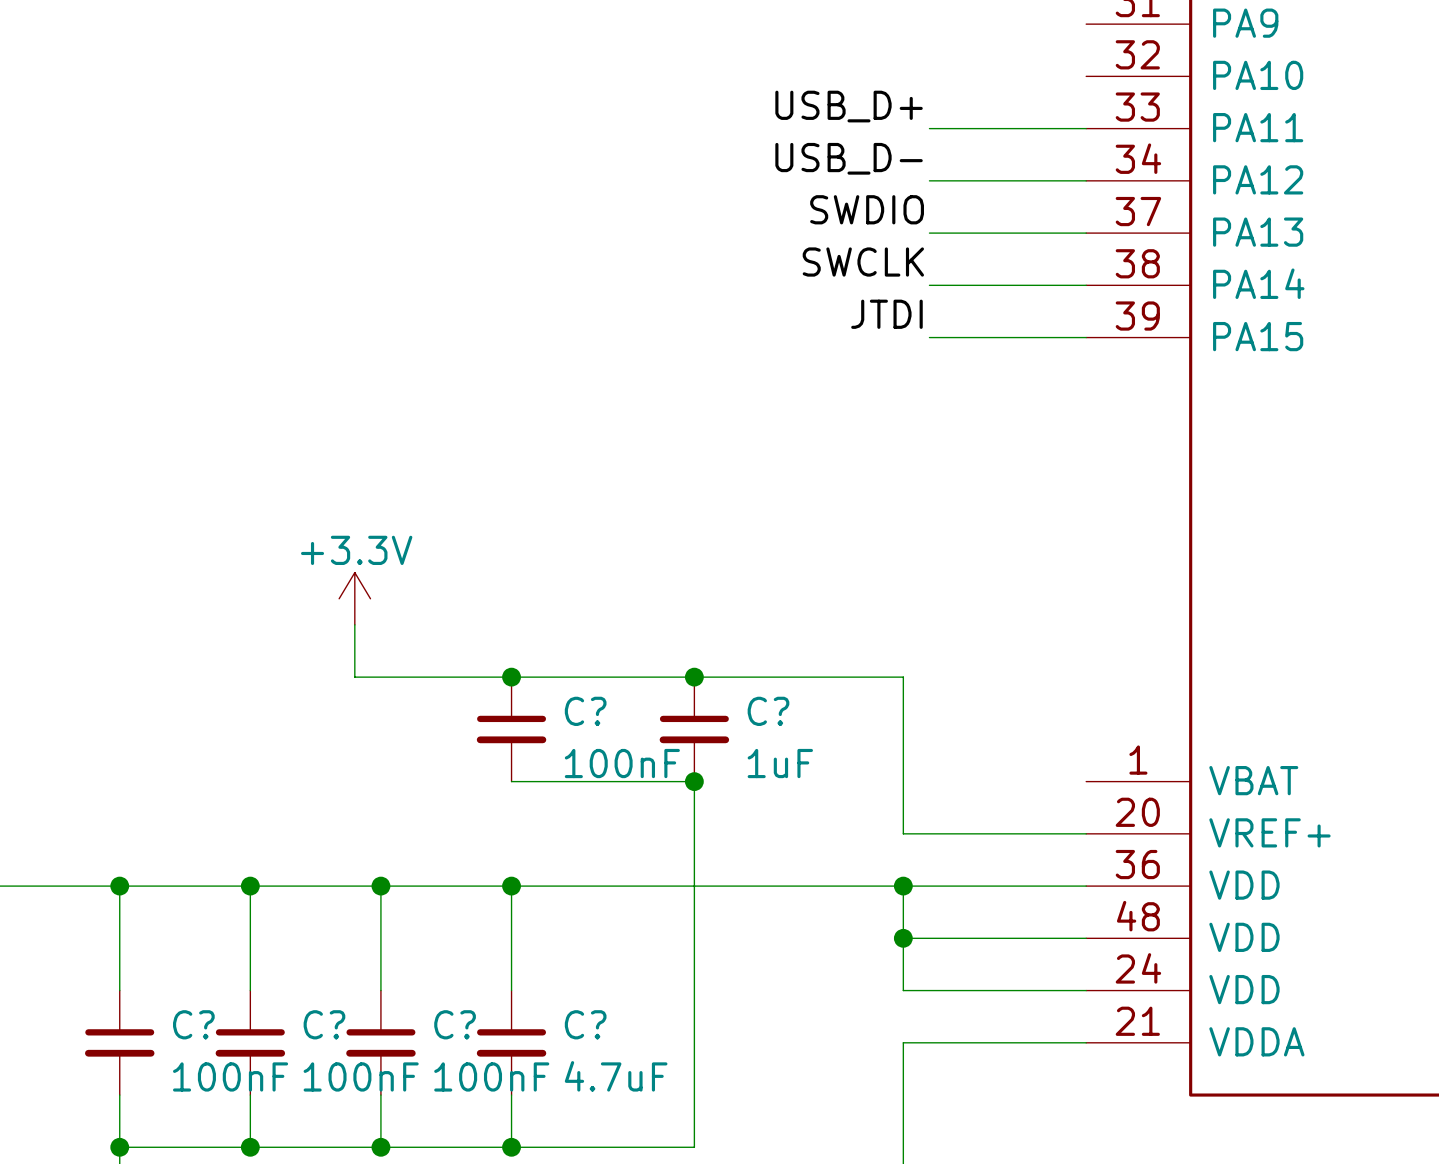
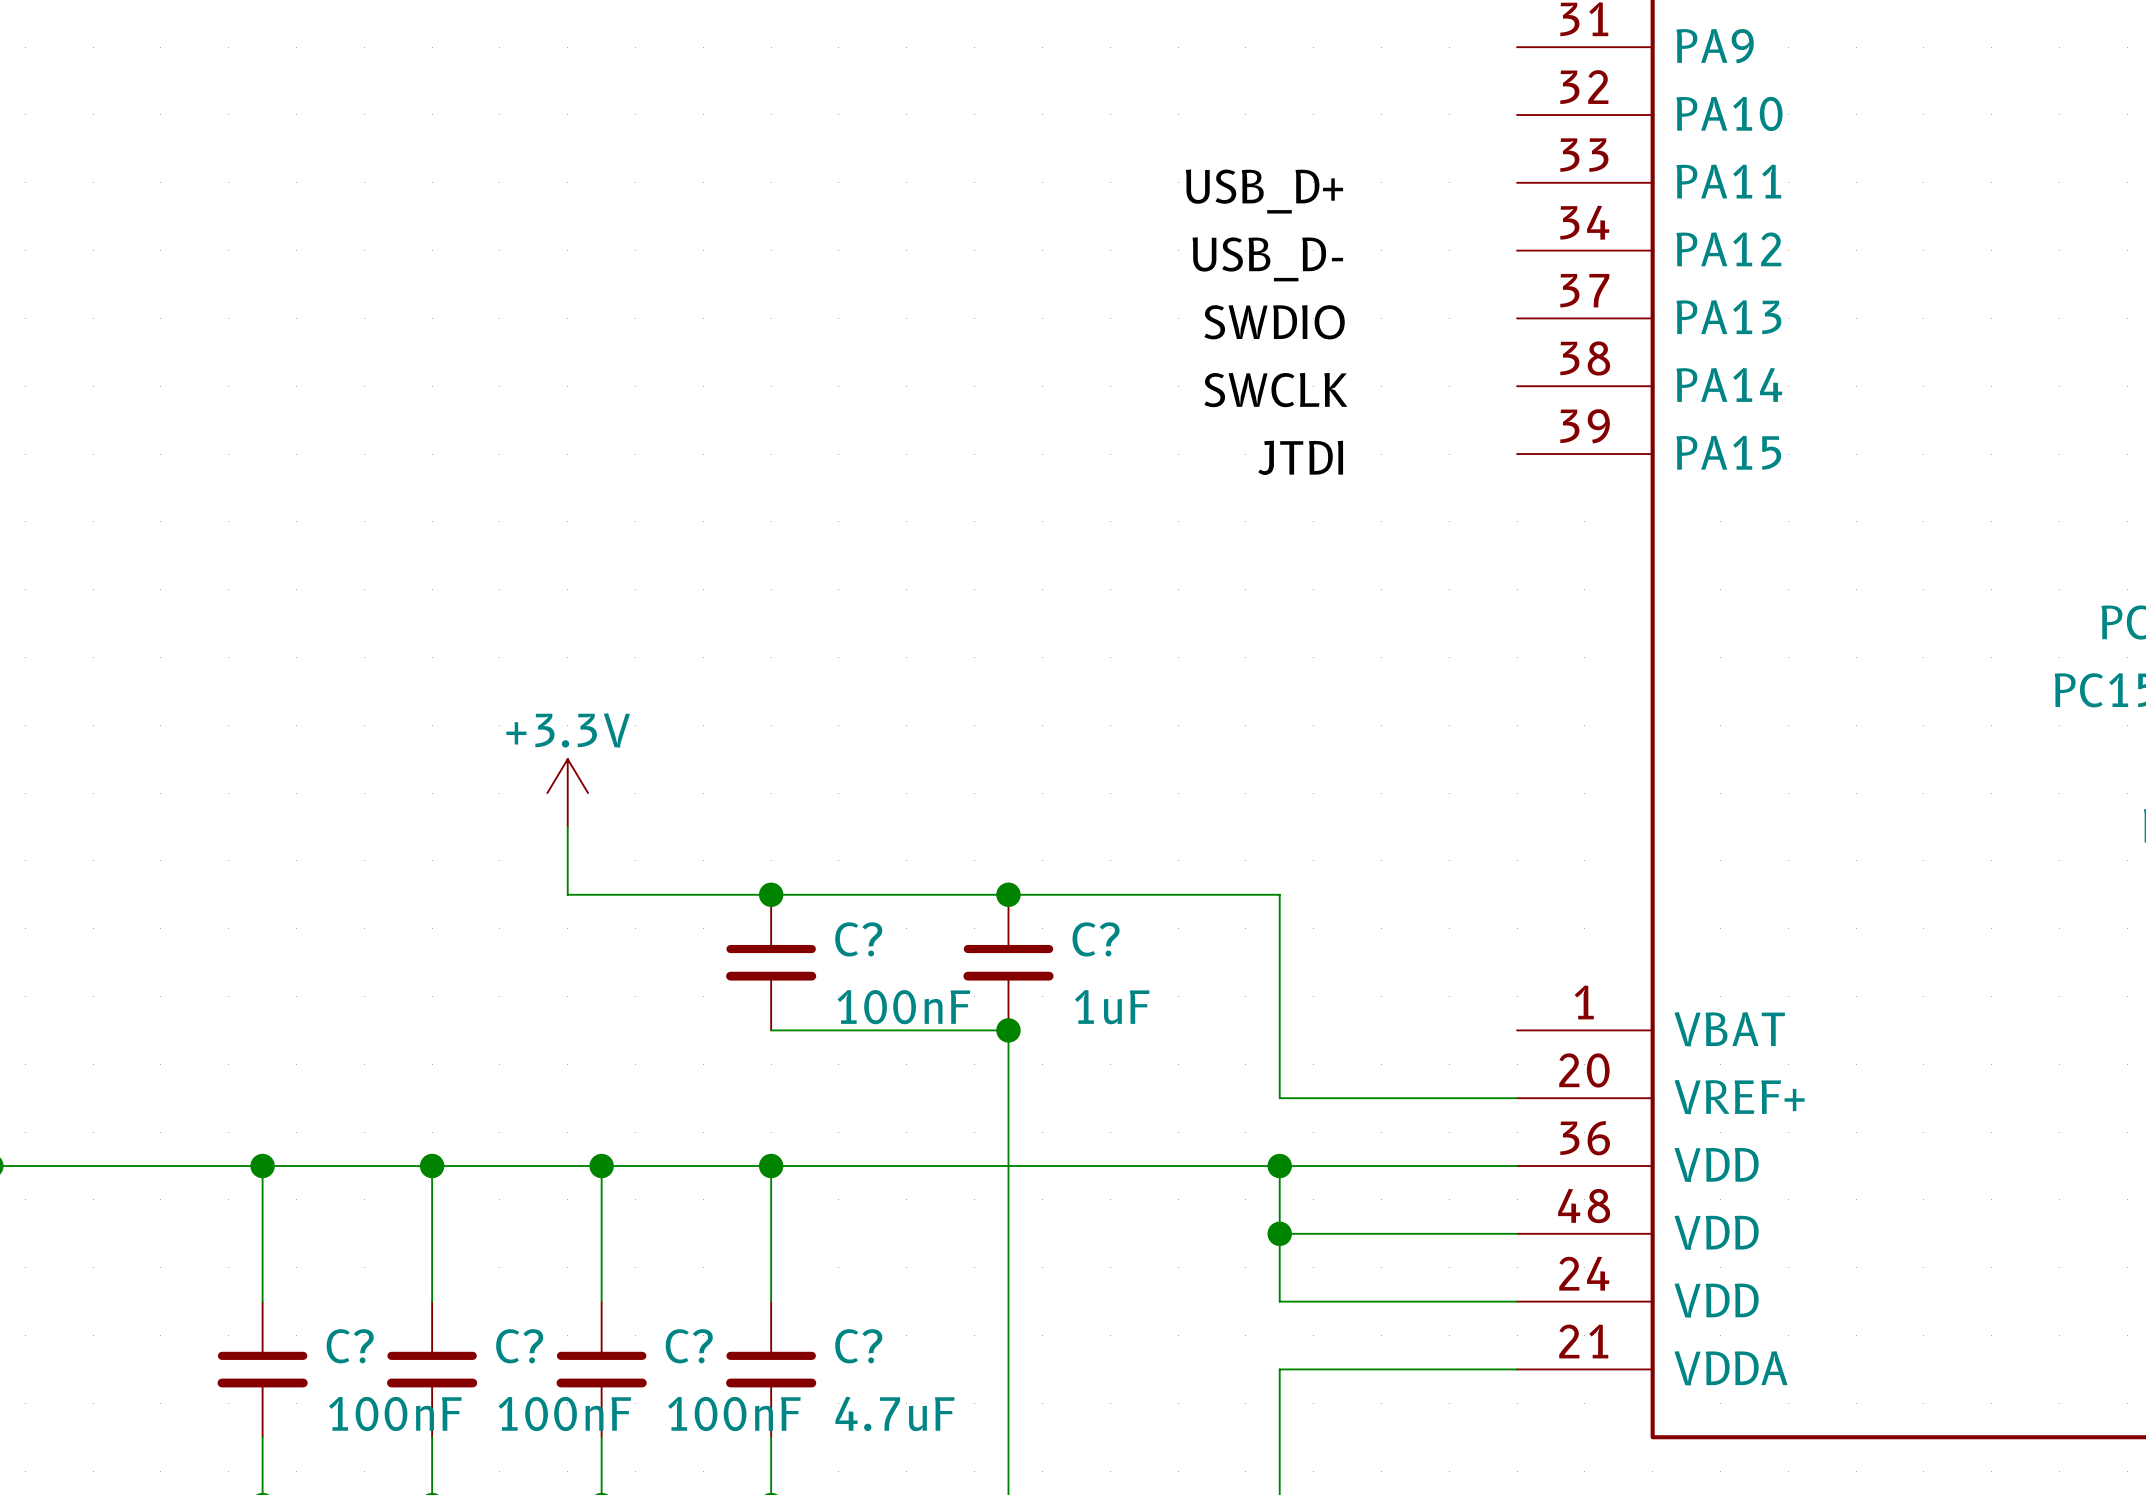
label position: USB_D+ (849, 106) -> USB_D+ (1264, 191)
wire: (929, 128) (1086, 128) -> none
label position: USB_D- (849, 158) -> USB_D- (1267, 259)
wire: (929, 180) (1086, 180) -> none
label position: SWDIO (867, 209) -> SWDIO (1274, 322)
wire: (929, 233) (1086, 233) -> none
label position: SWCLK (863, 262) -> SWCLK (1275, 390)
wire: (929, 285) (1086, 285) -> none
label position: JTDI (886, 314) -> JTDI (1300, 457)
wire: (929, 337) (1086, 337) -> none

